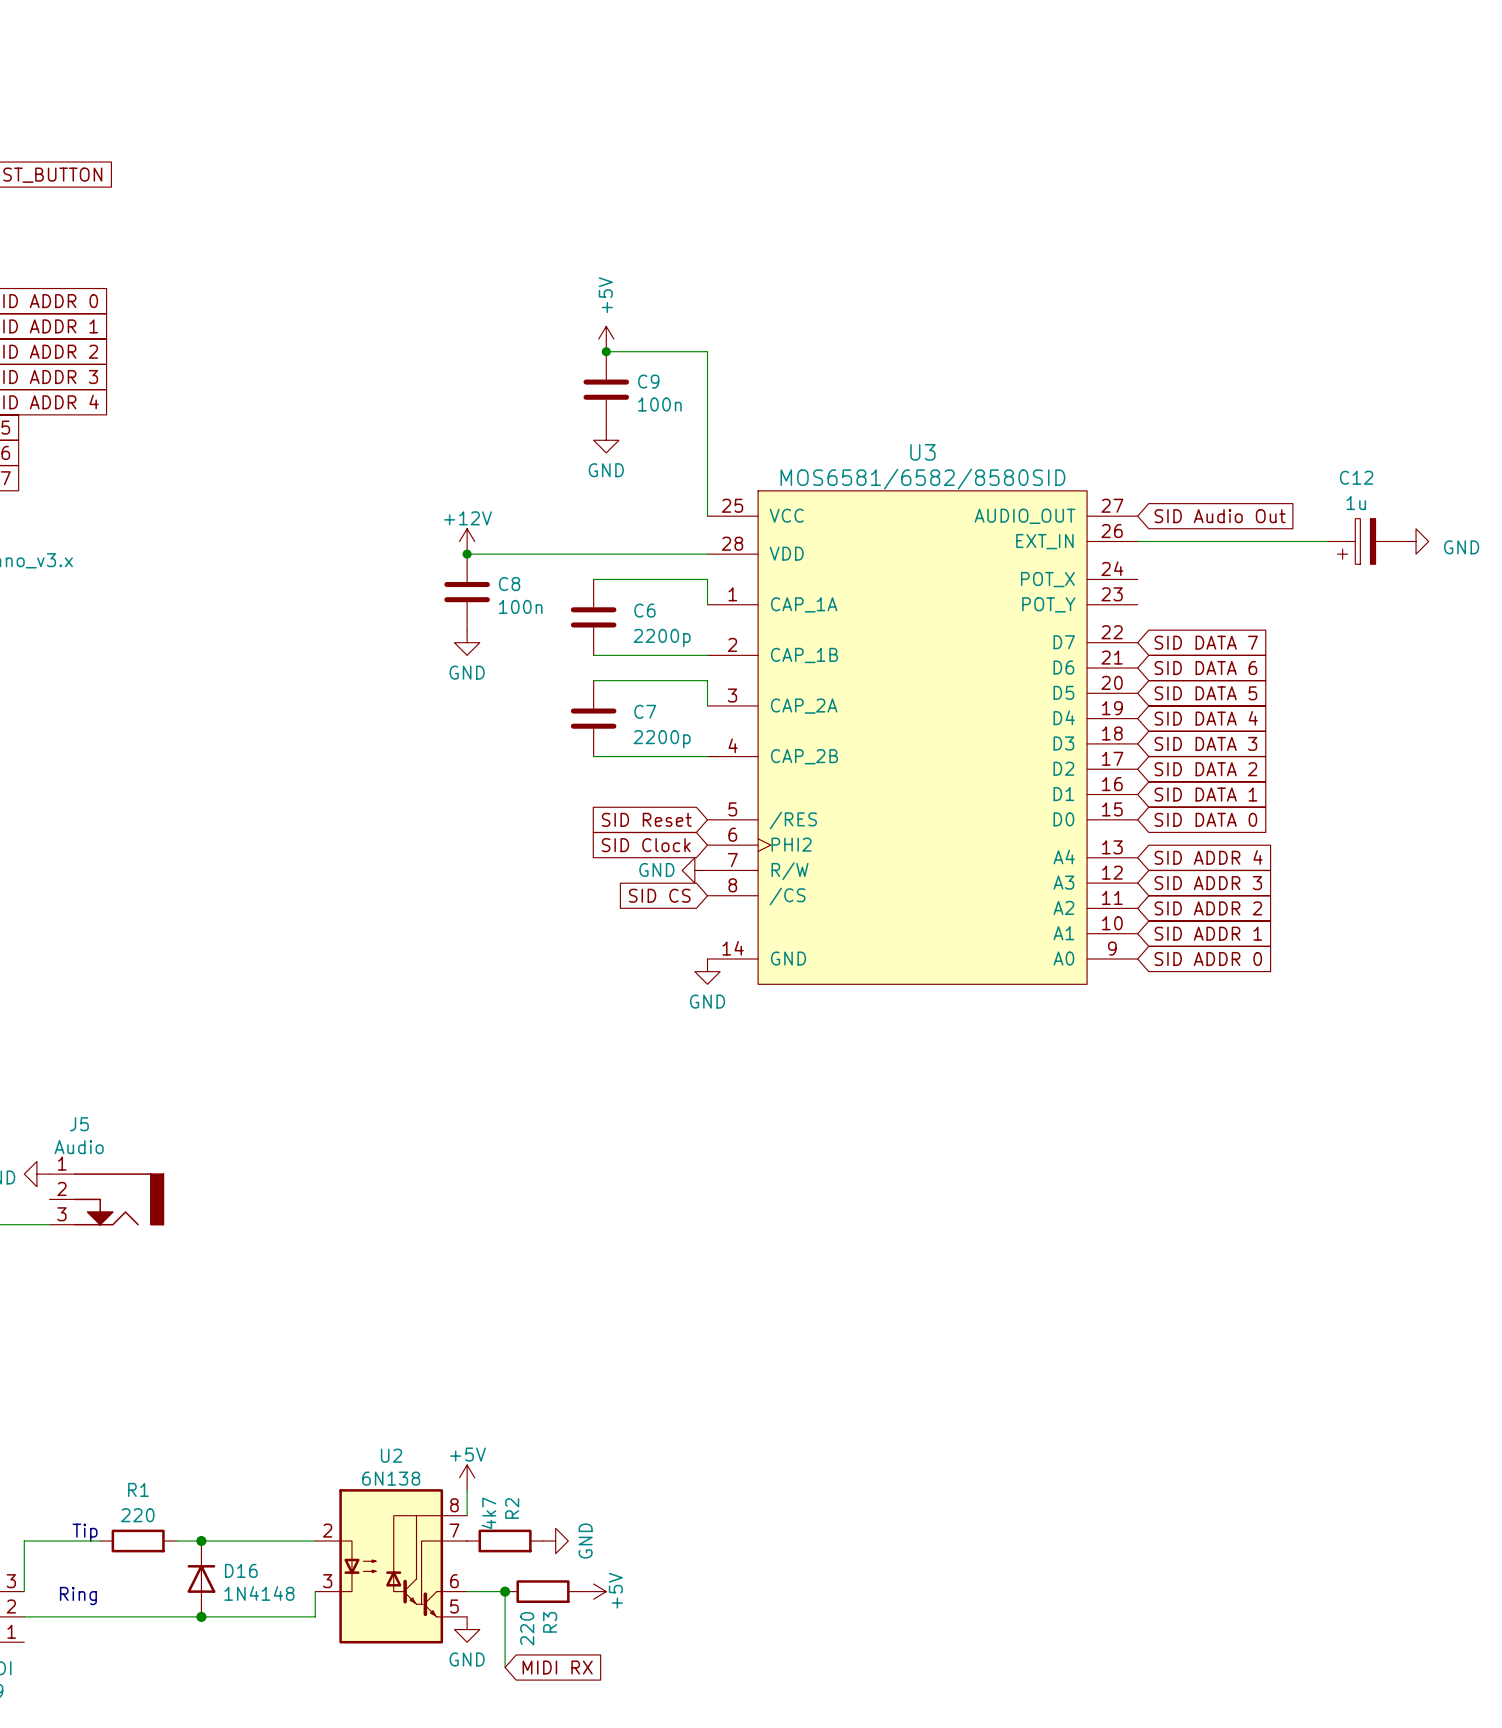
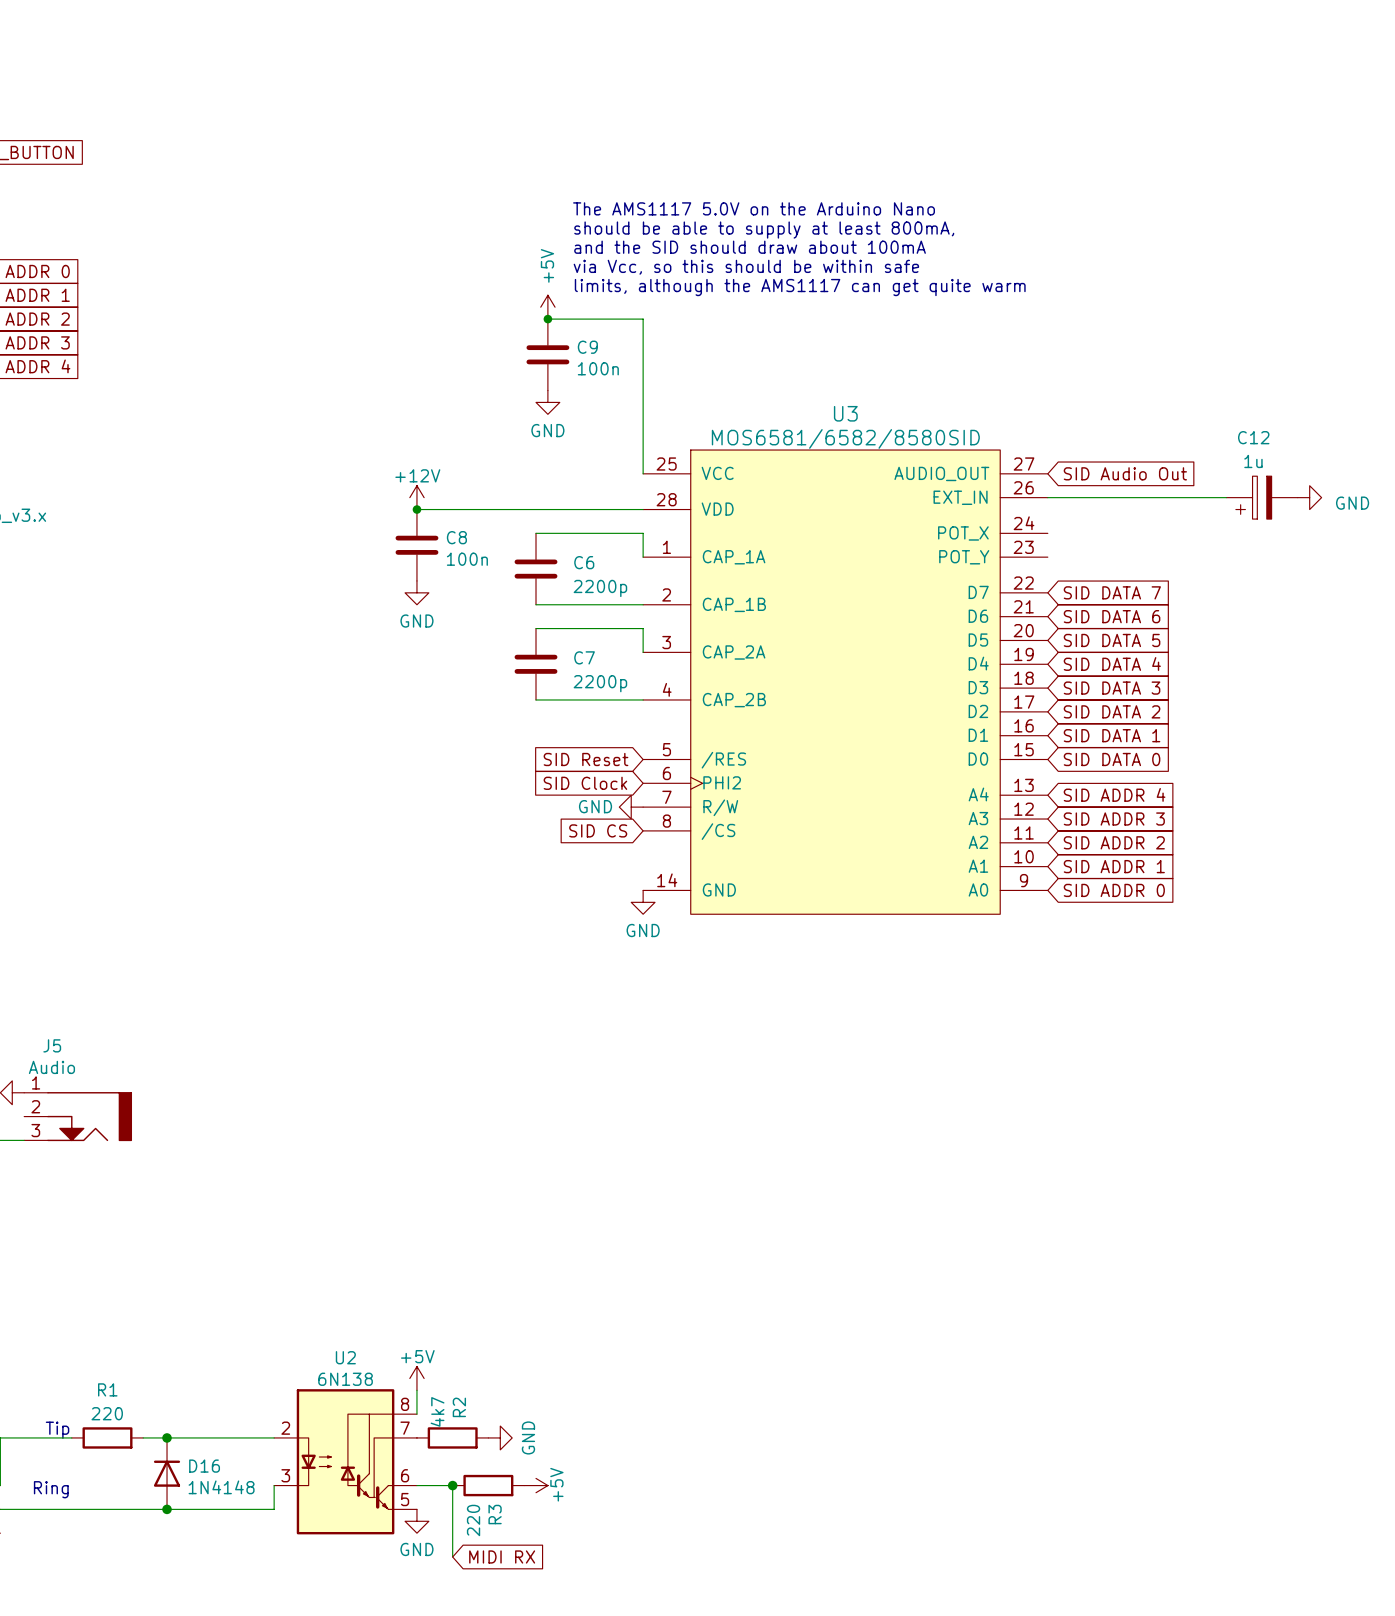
text: none -> The AMS1117 5.0V on the Arduino Nano (754, 208)
text: none -> should be able to supply at least 800mA, (764, 230)
text: none -> and the SID should draw about 100mA (750, 247)
text: none -> via Vcc, so this should be within safe (746, 267)
text: none -> limits, although the AMS1117 can get quite warm (800, 287)

